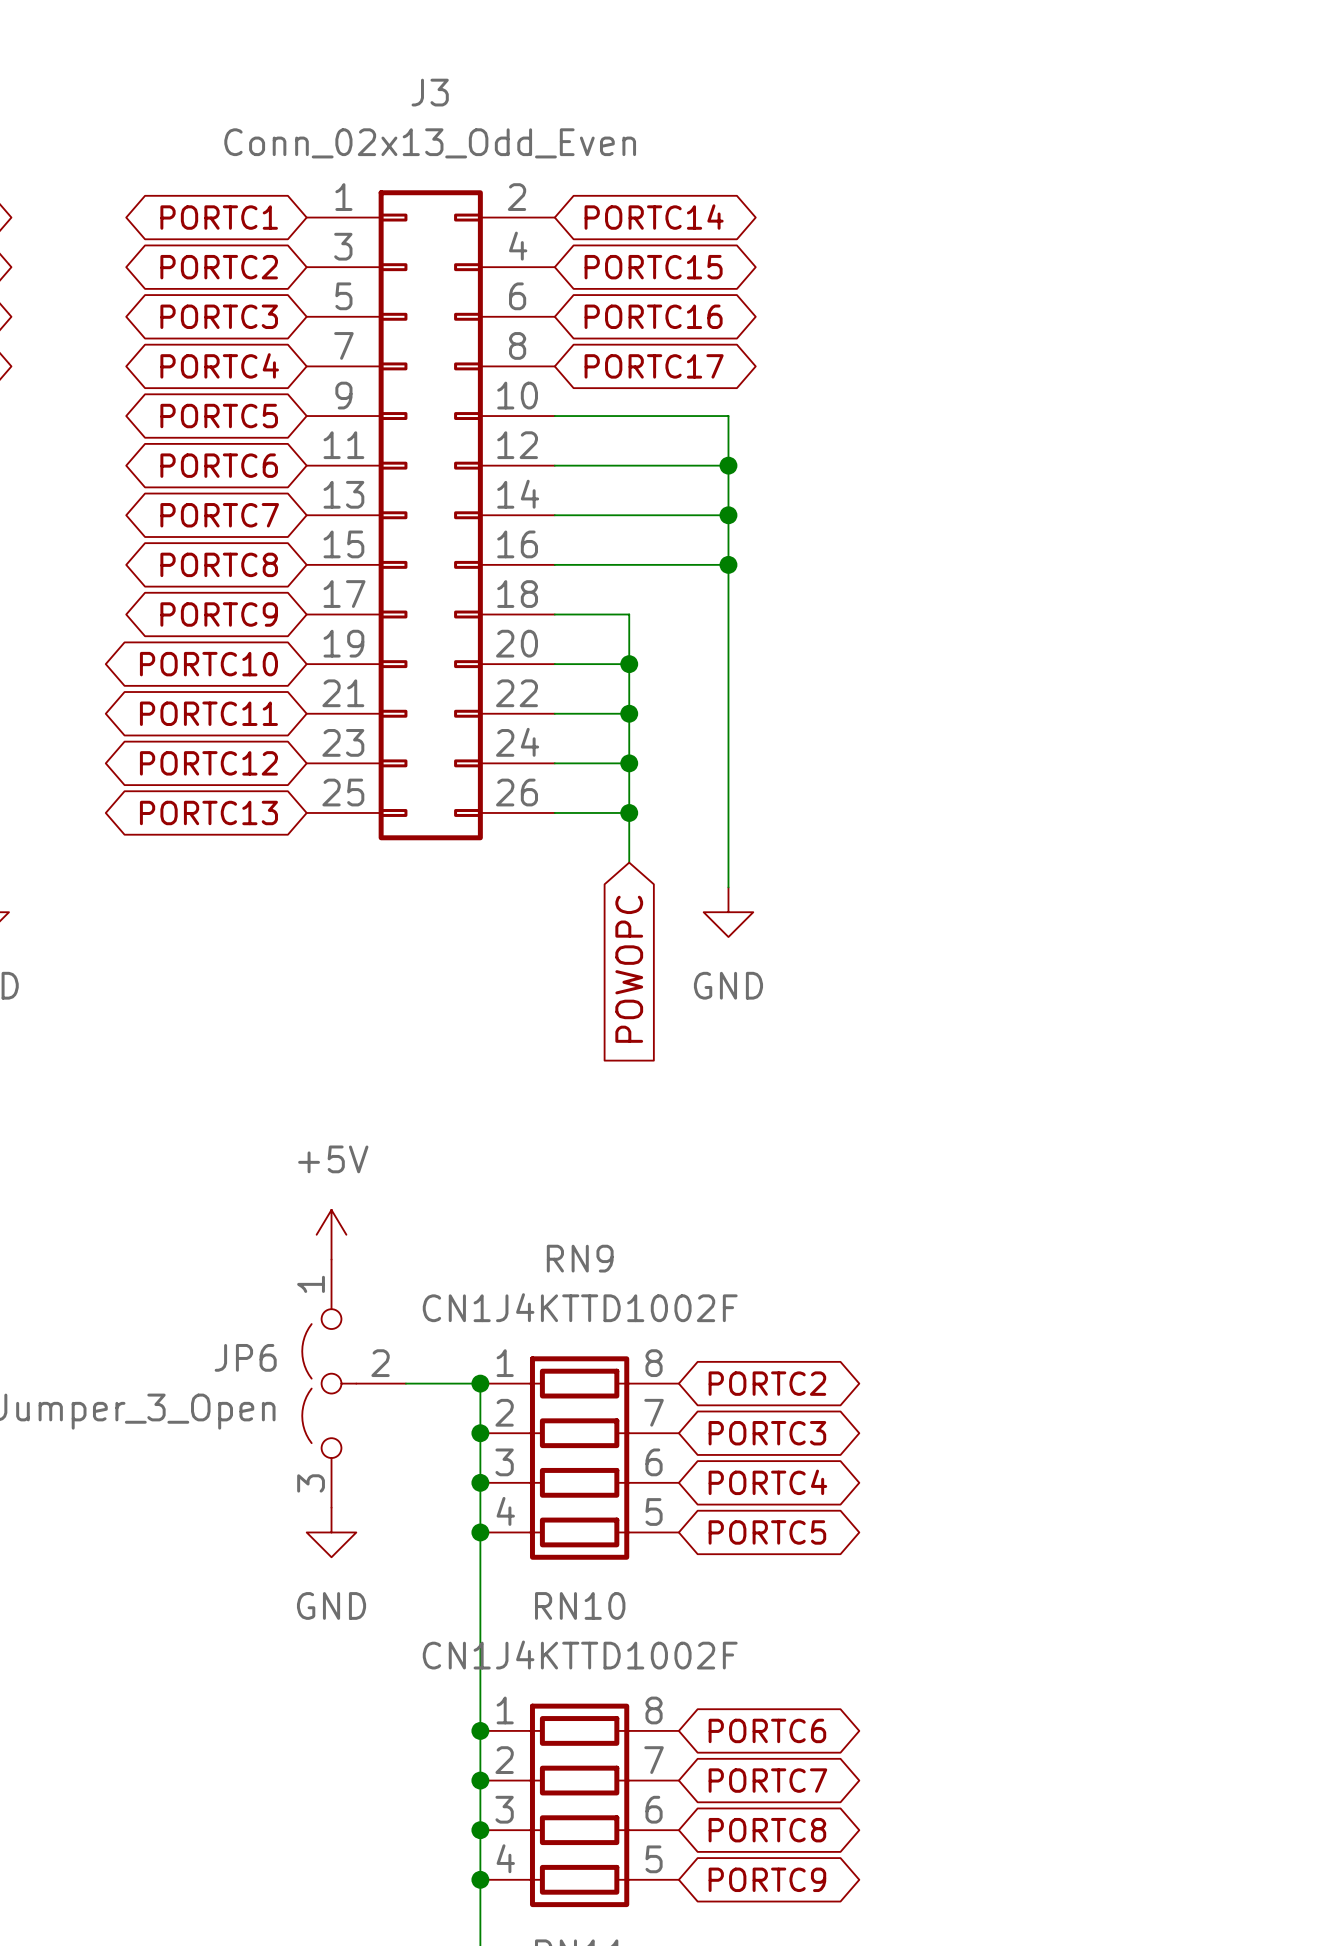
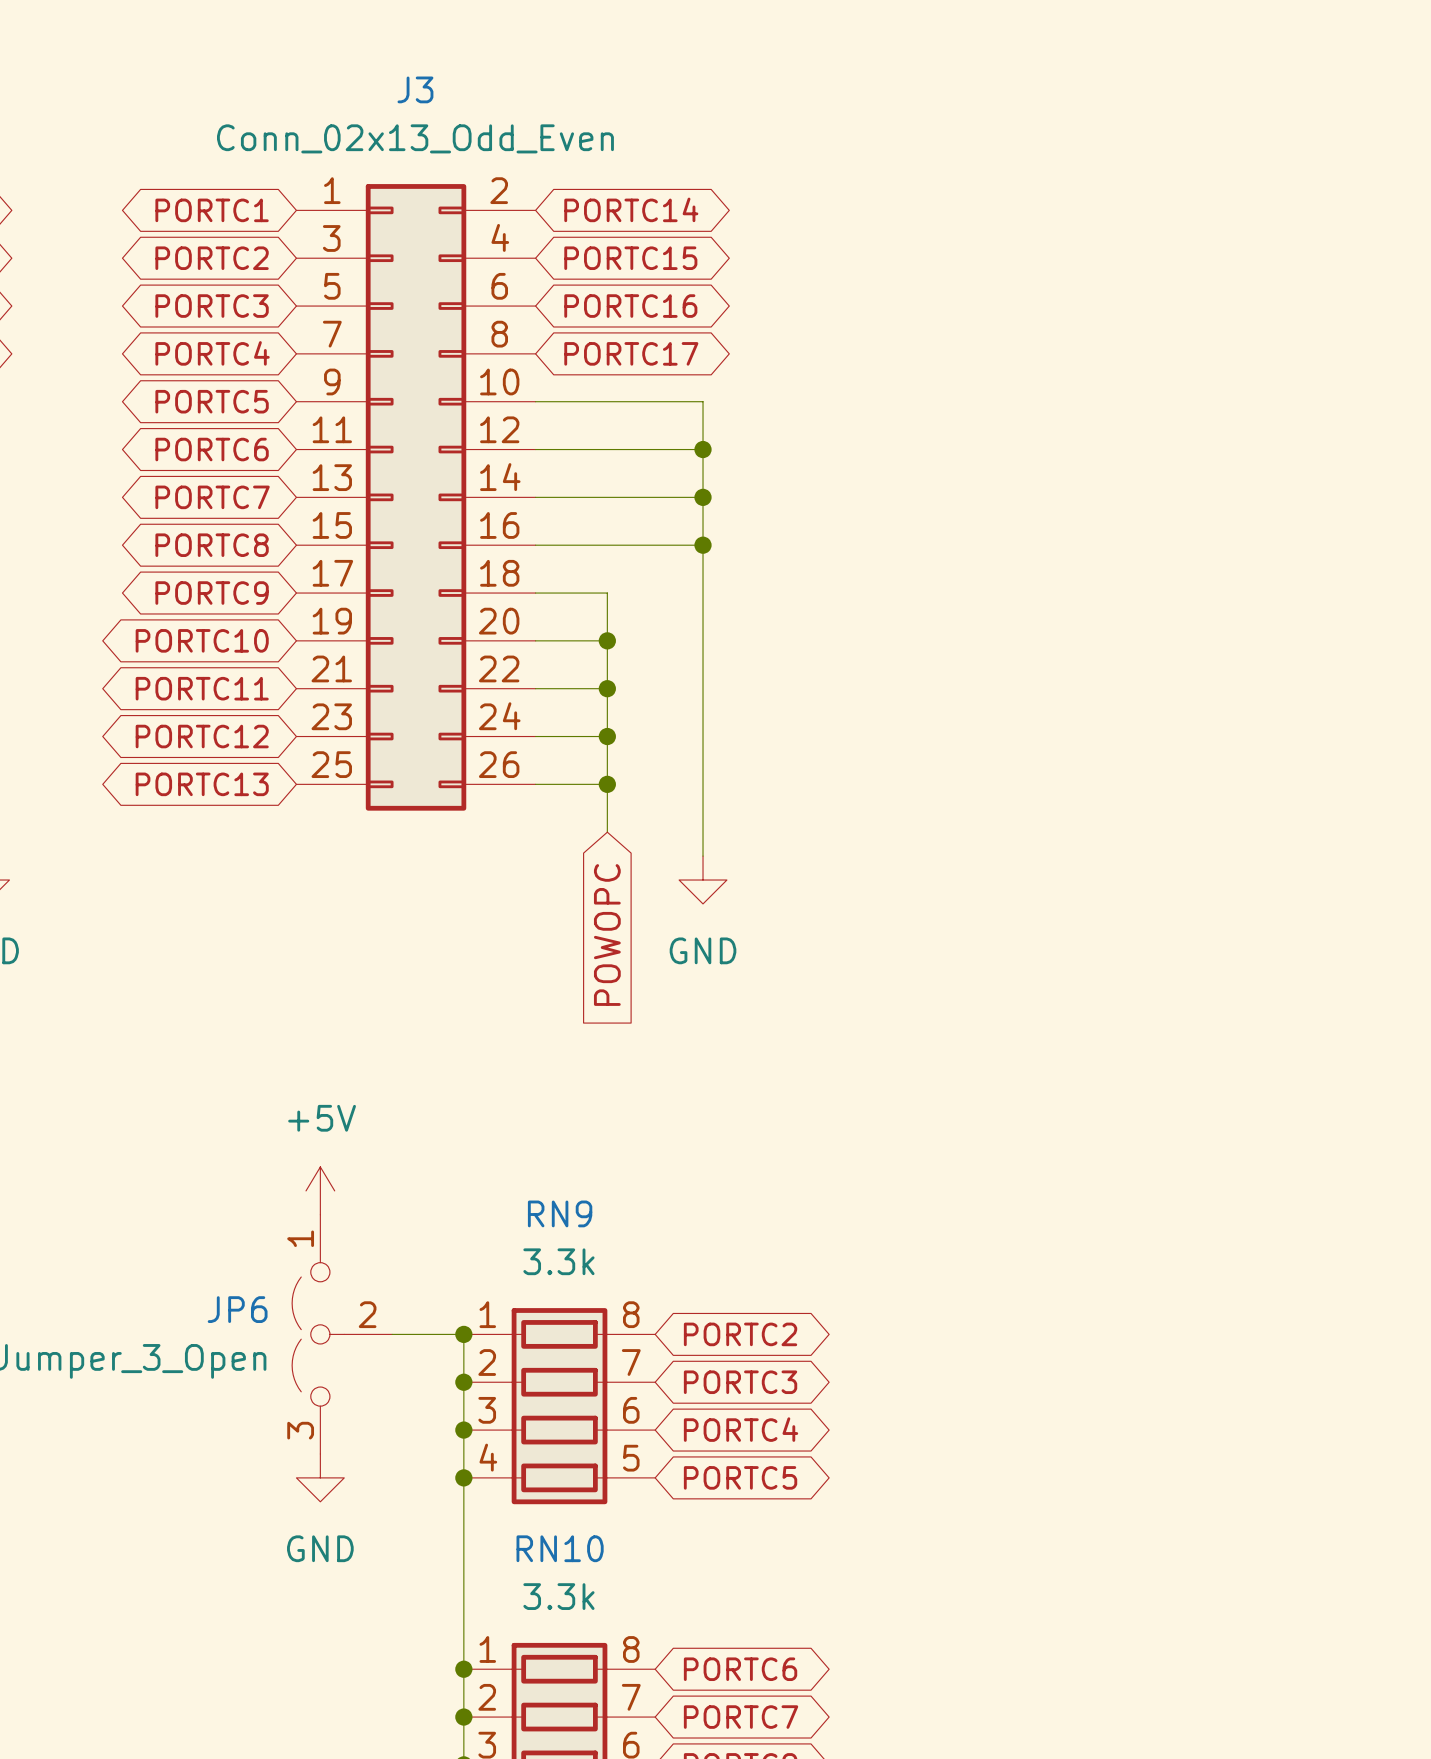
RN9 value: CN1J4KTTD1002F (580, 1307) -> 3.3k (558, 1261)
RN10 value: CN1J4KTTD1002F (580, 1654) -> 3.3k (558, 1596)

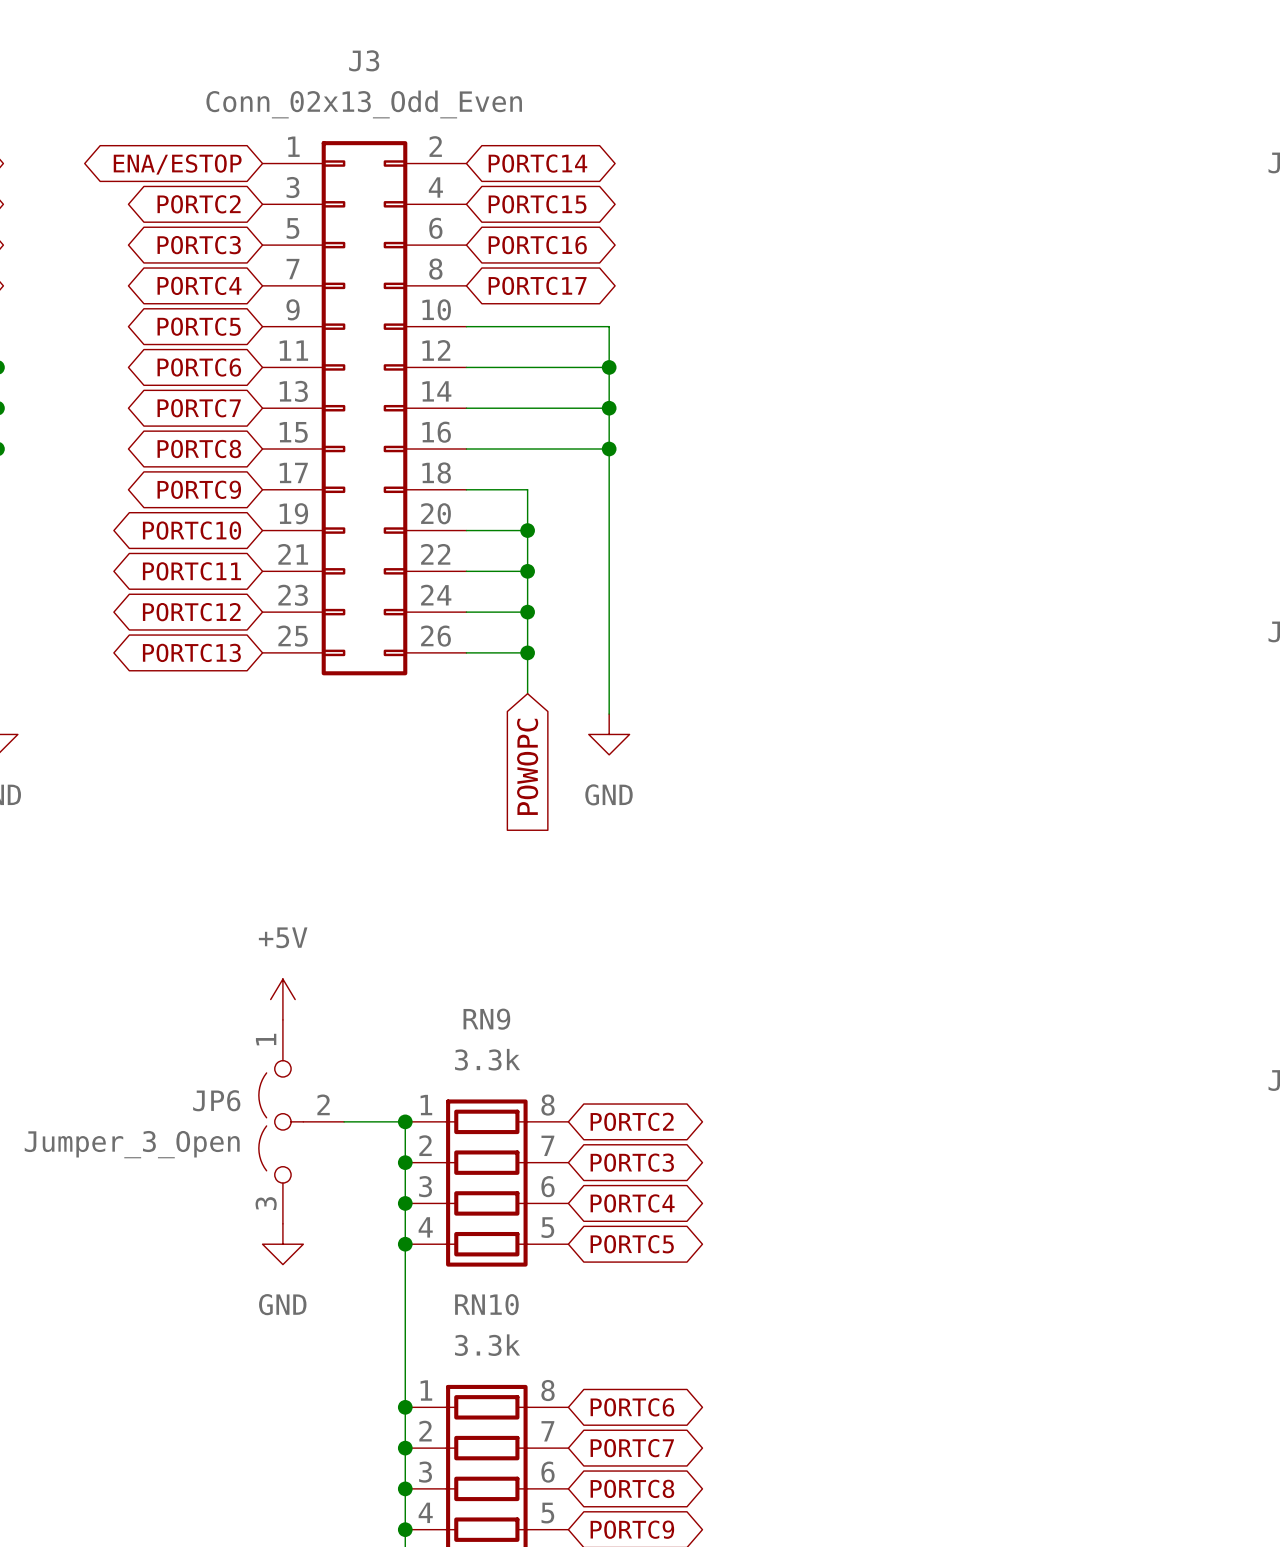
global label: PORTC1 (212, 210) -> ENA/ESTOP (177, 164)

